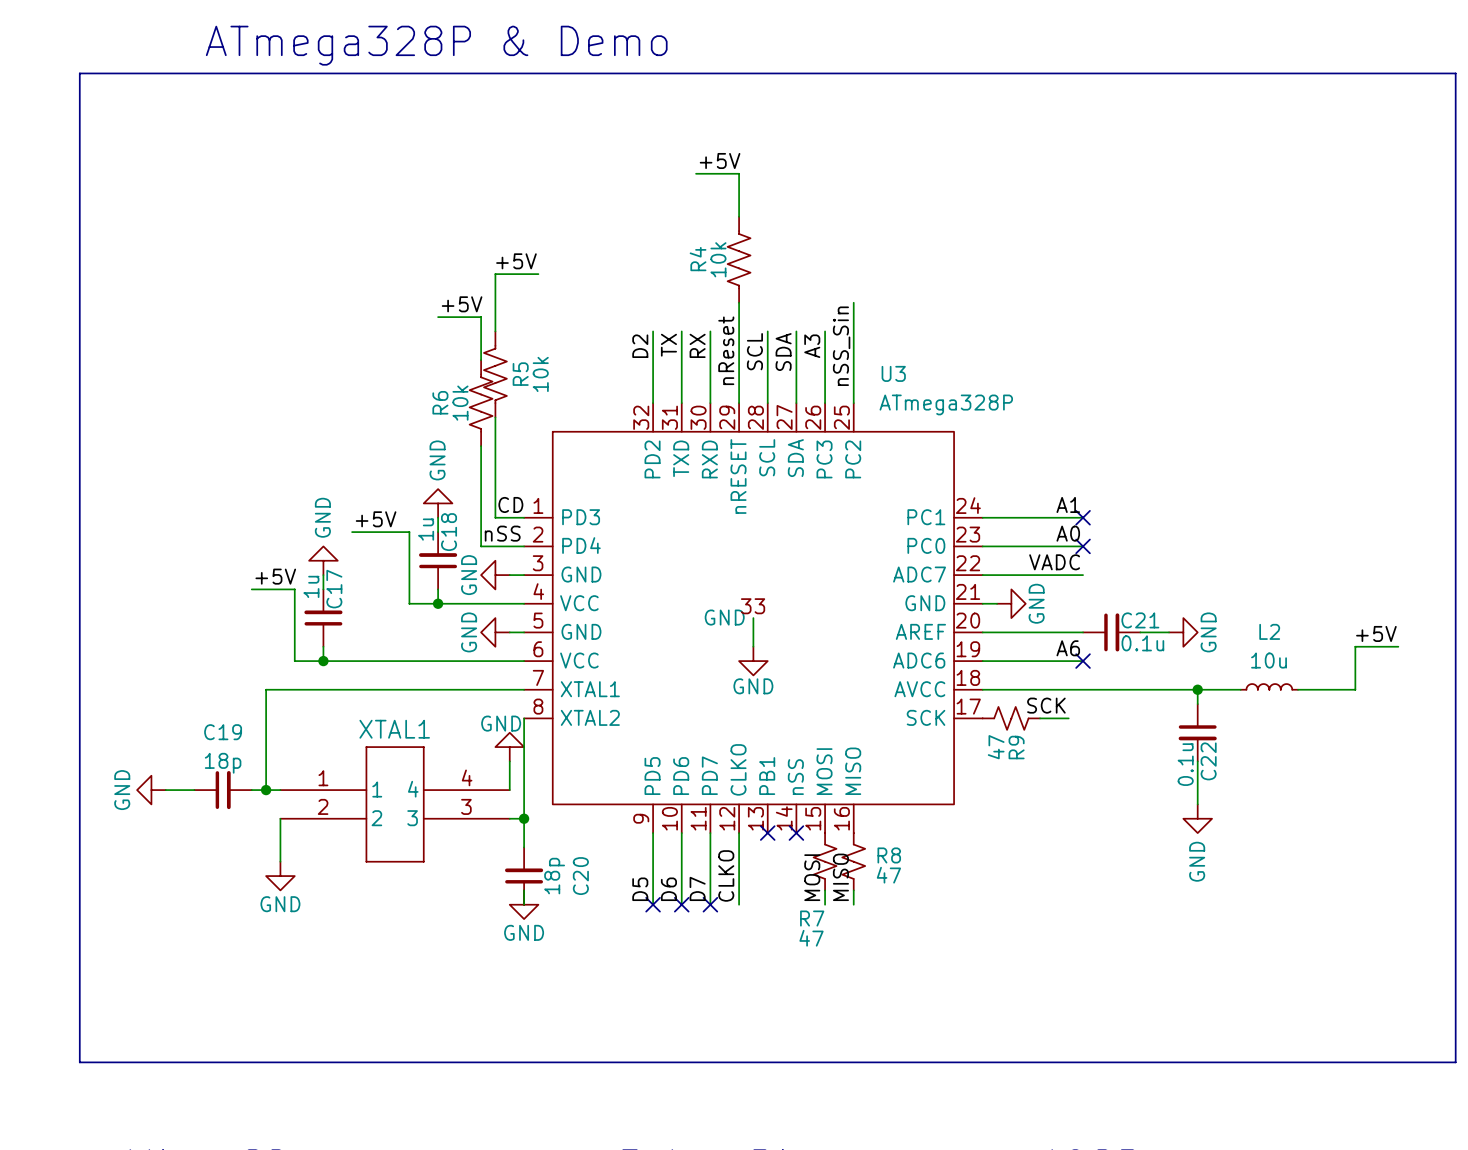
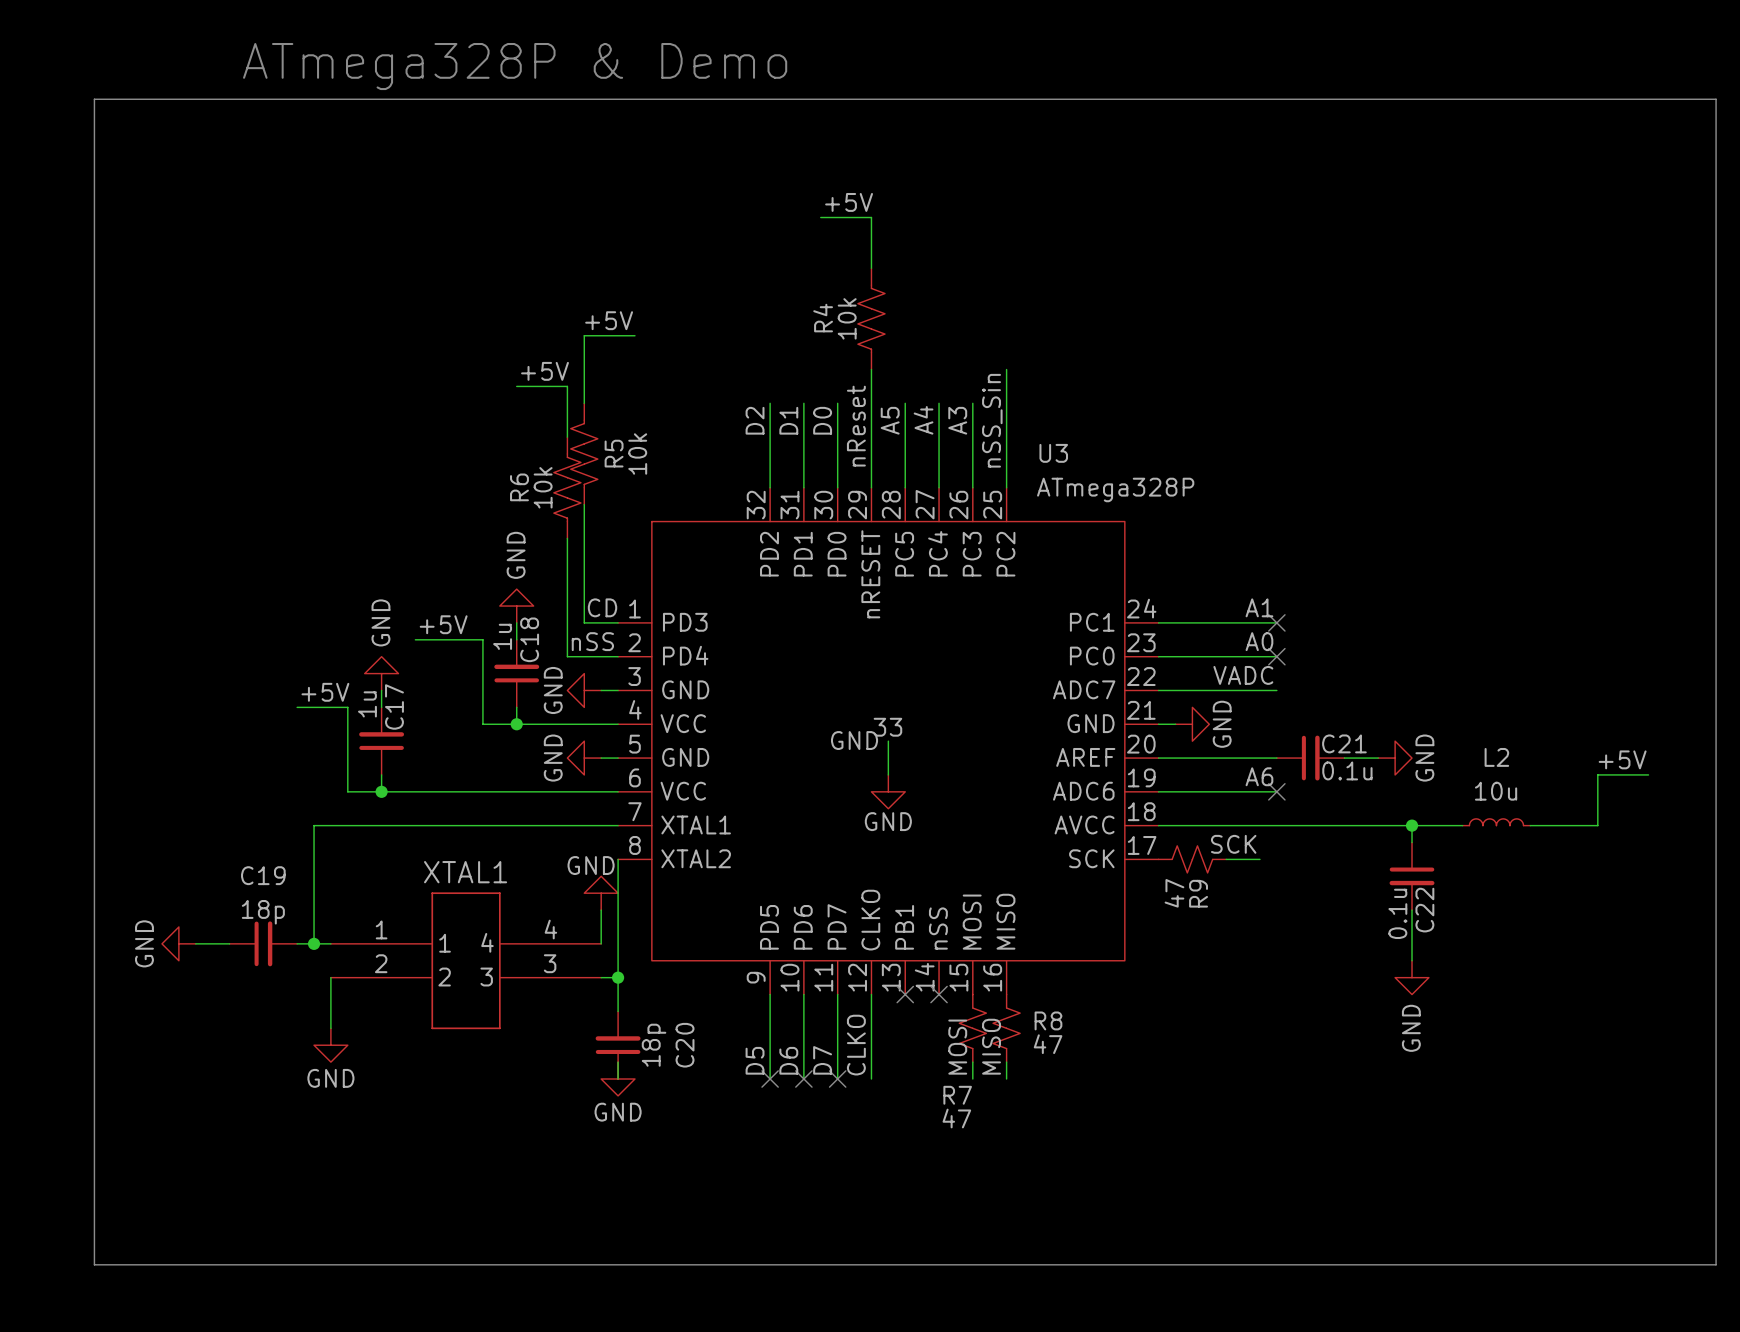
label: TX (668, 345) -> D1 (788, 420)
label: RX (697, 345) -> D0 (822, 420)
label: SCL (754, 351) -> A5 (890, 420)
label: SDA (783, 352) -> A4 (923, 420)
U3 pin name: SCL (767, 457) -> PC5 (904, 554)
U3 pin name: TXD (681, 458) -> PD1 (803, 554)
U3 pin name: SDA (795, 458) -> PC4 (937, 553)
U3 pin name: RXD (709, 459) -> PD0 (837, 554)

